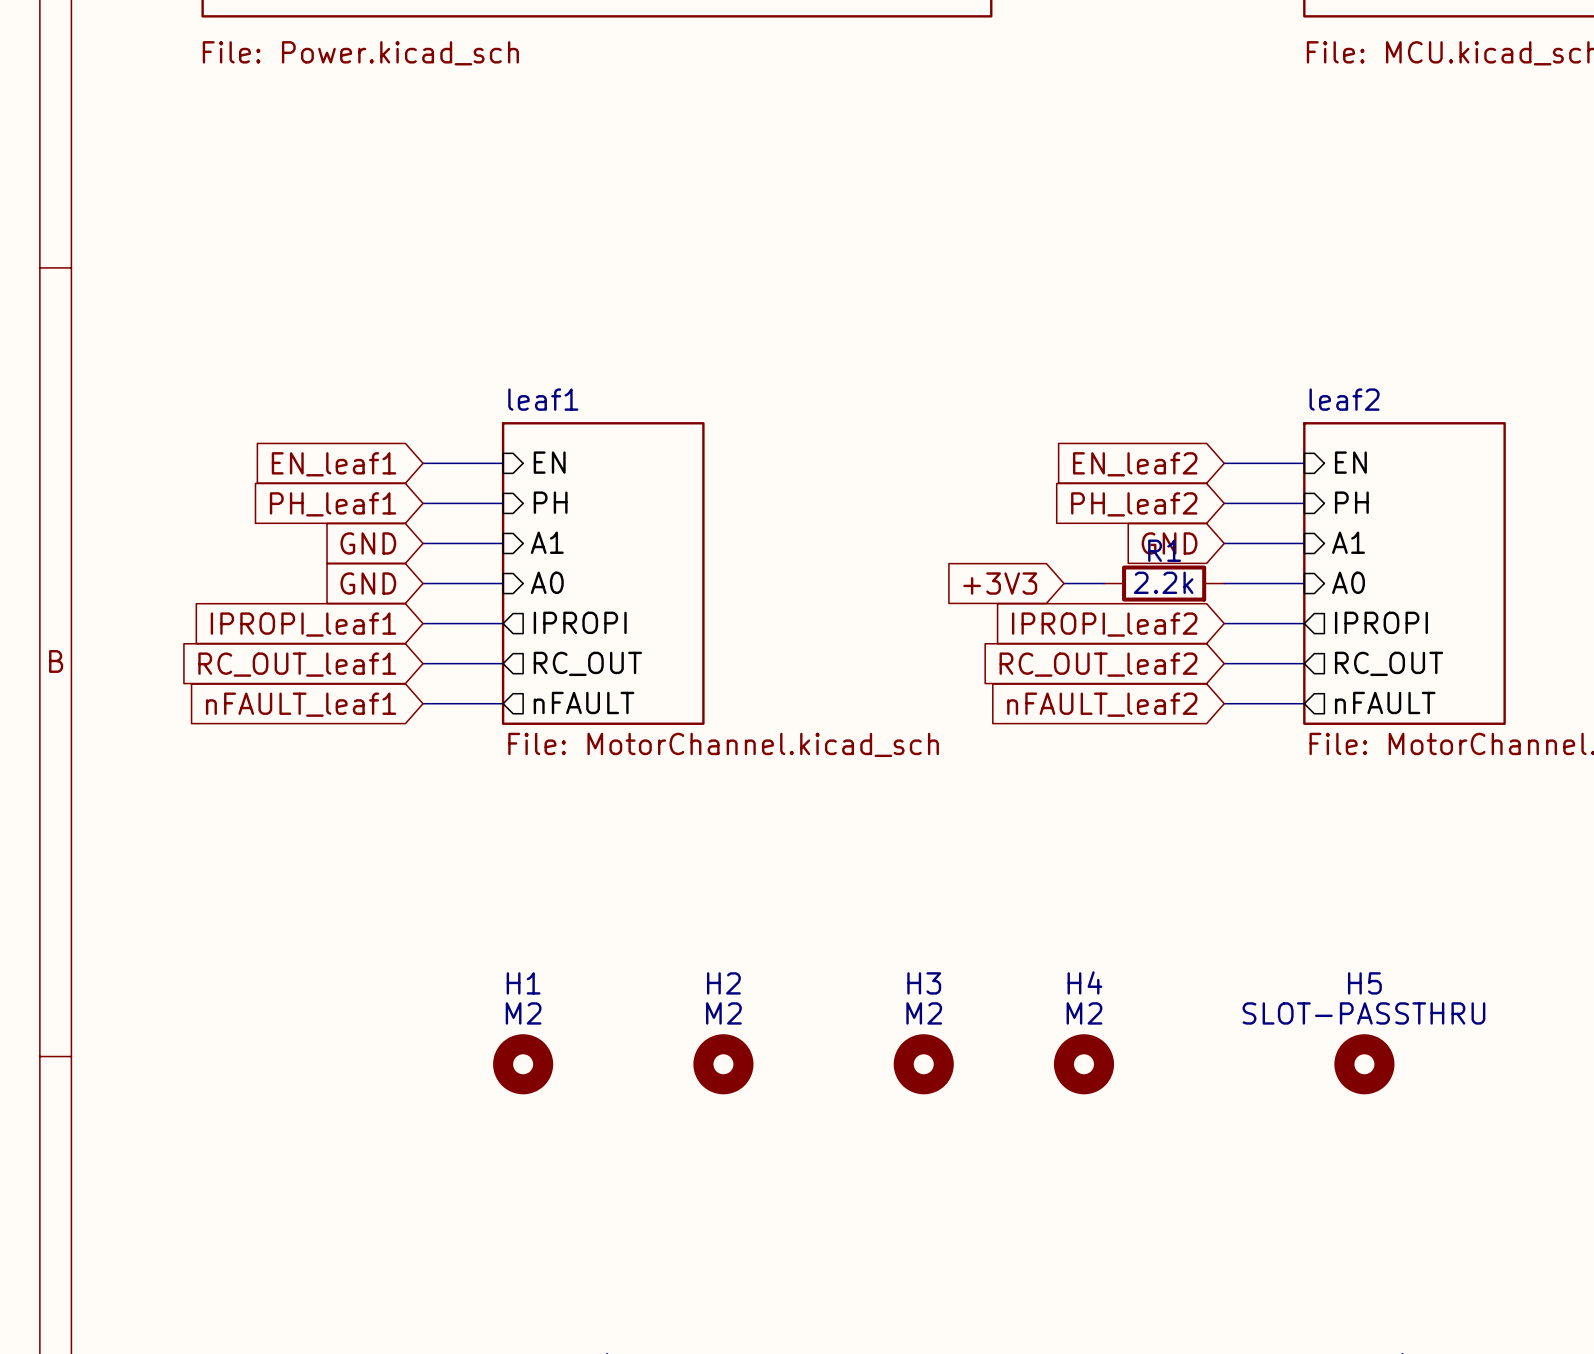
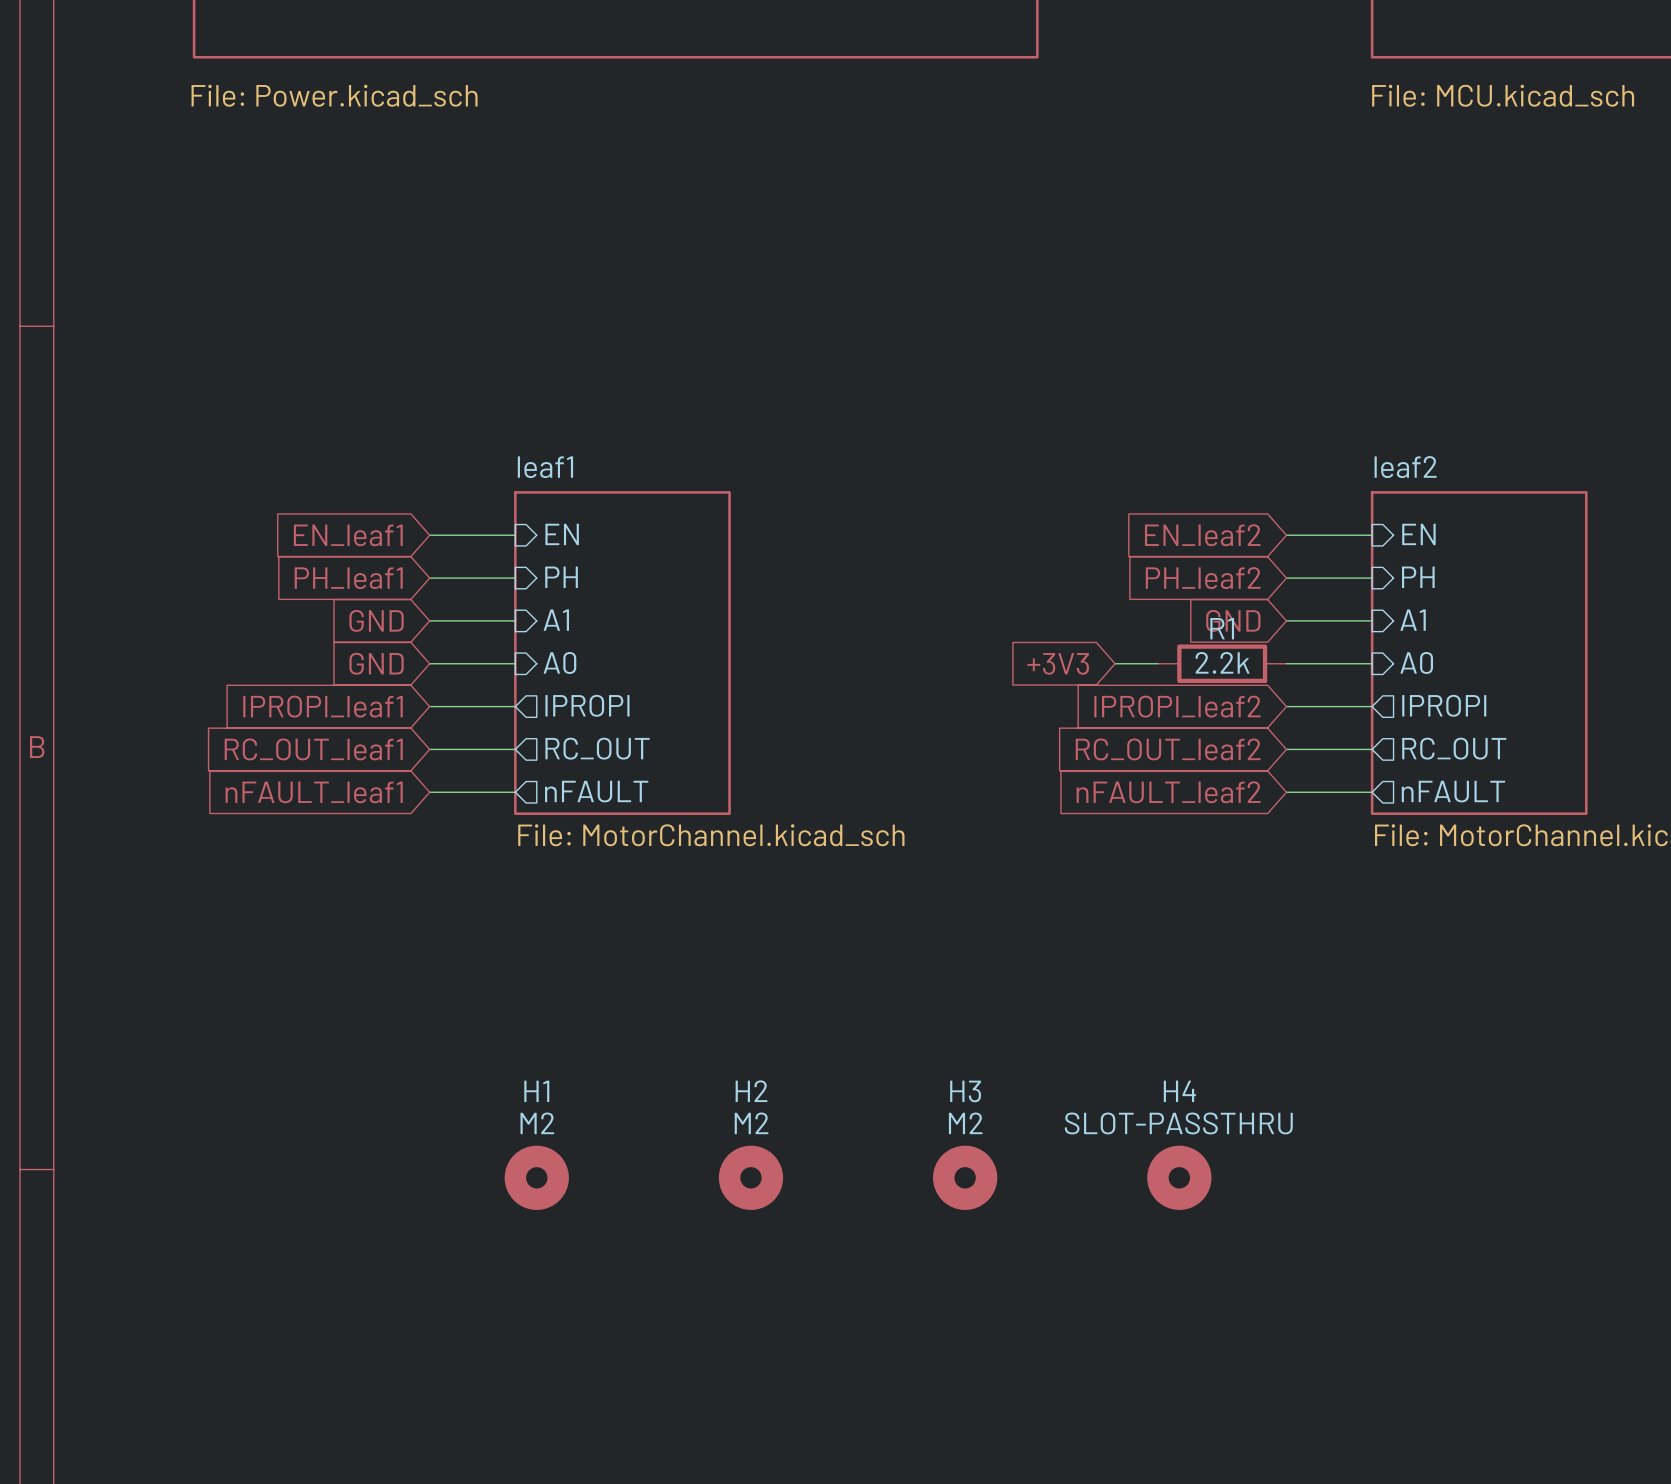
H4 value: M2 (1084, 1013) -> SLOT-PASSTHRU (1178, 1123)
H4 position: (1083, 1064) -> (1179, 1177)
H5: SLOT-PASSTHRU (1364, 1064) -> none

